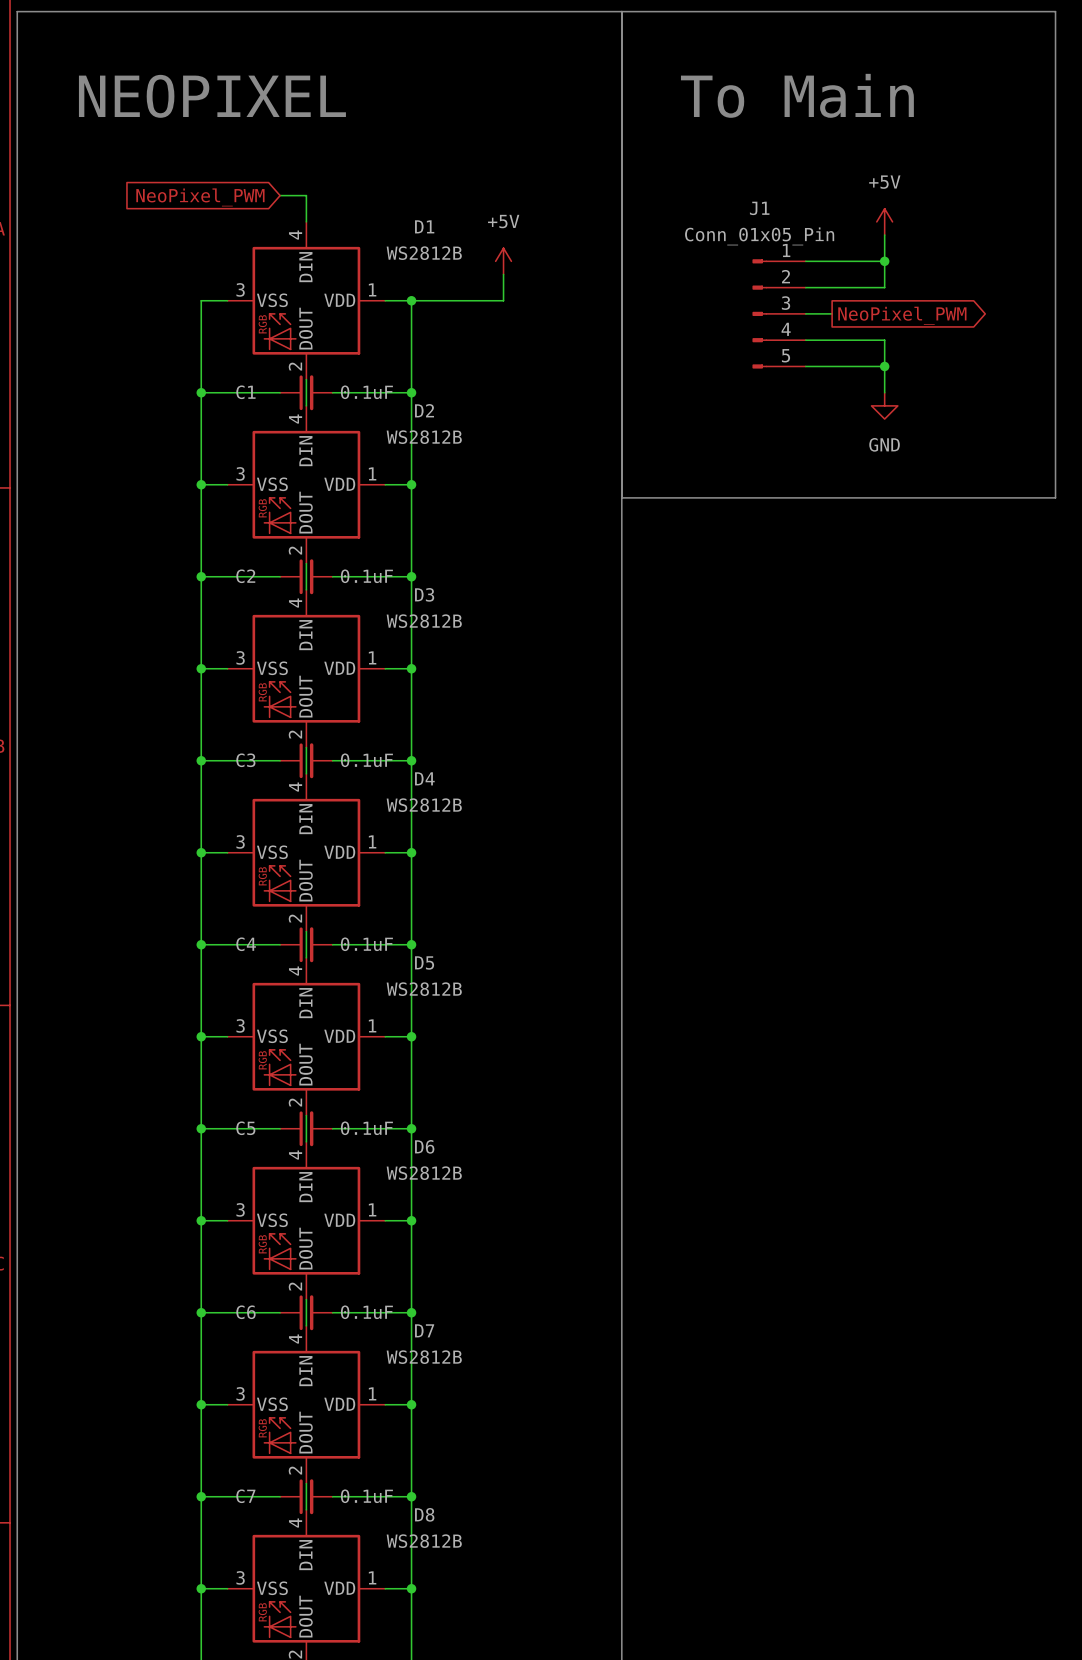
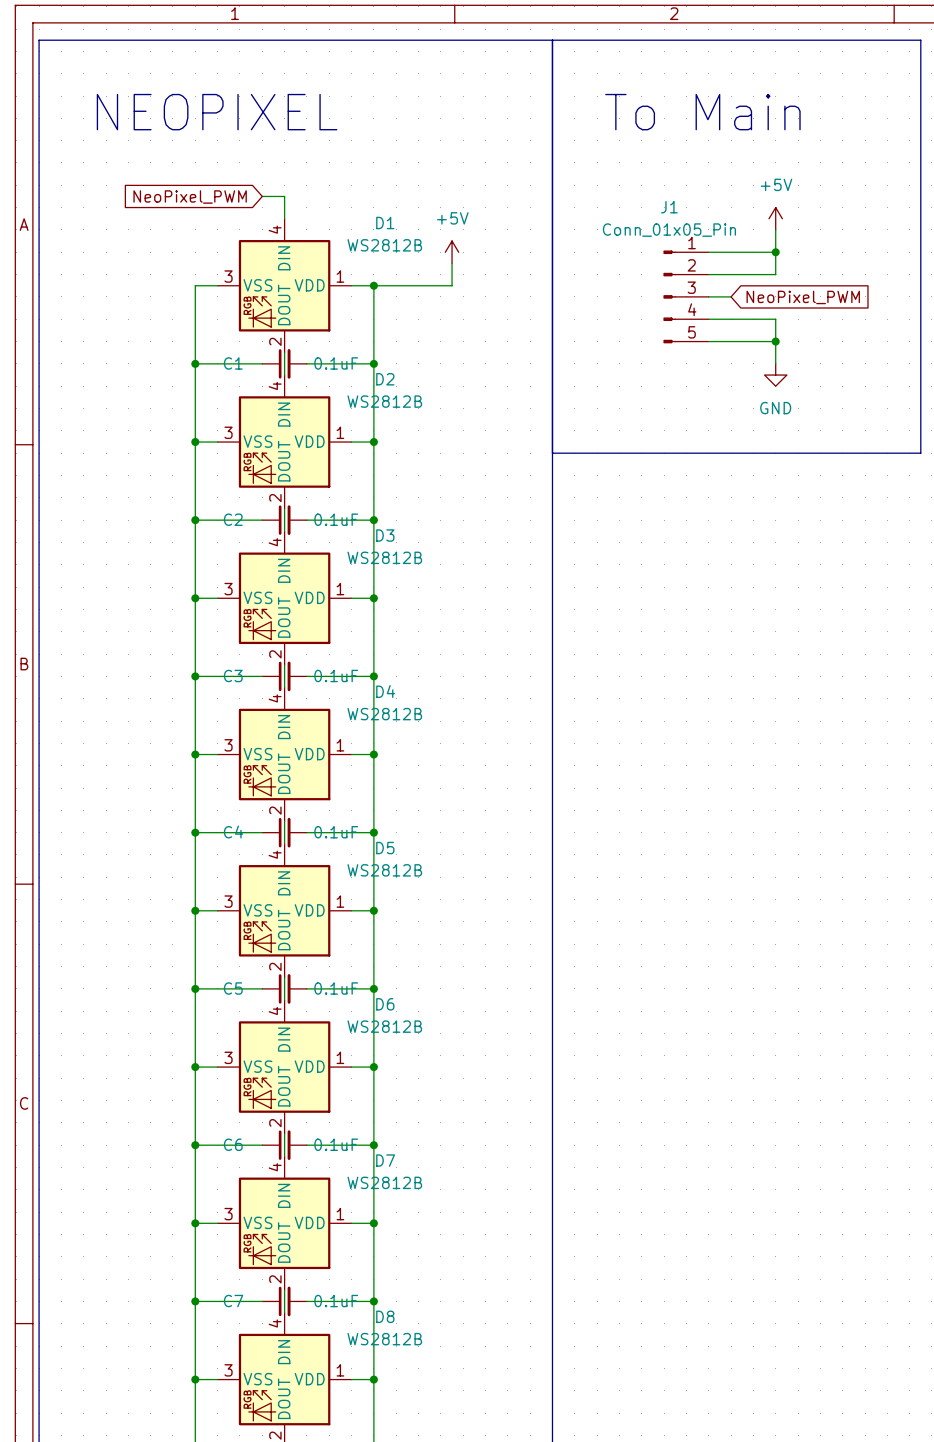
global label shape: output (902, 315) -> input (803, 297)

